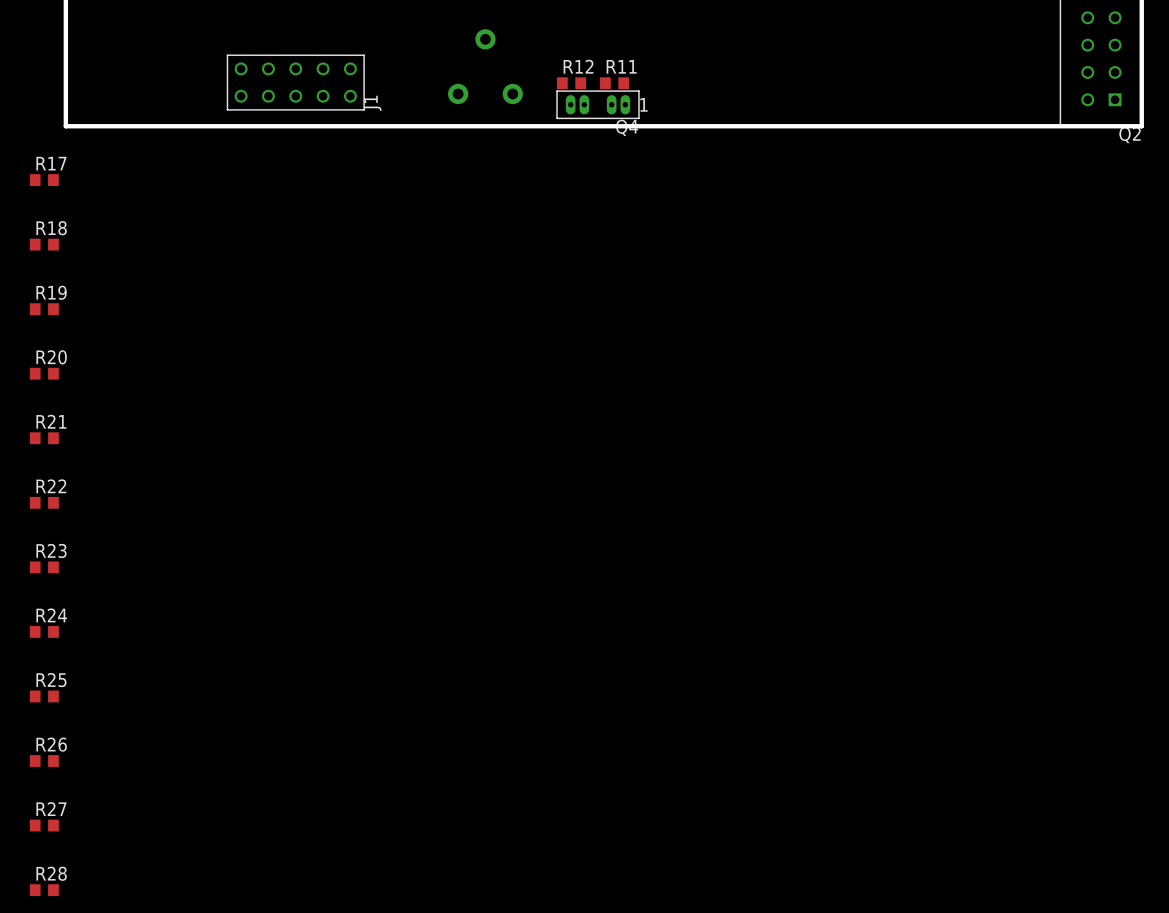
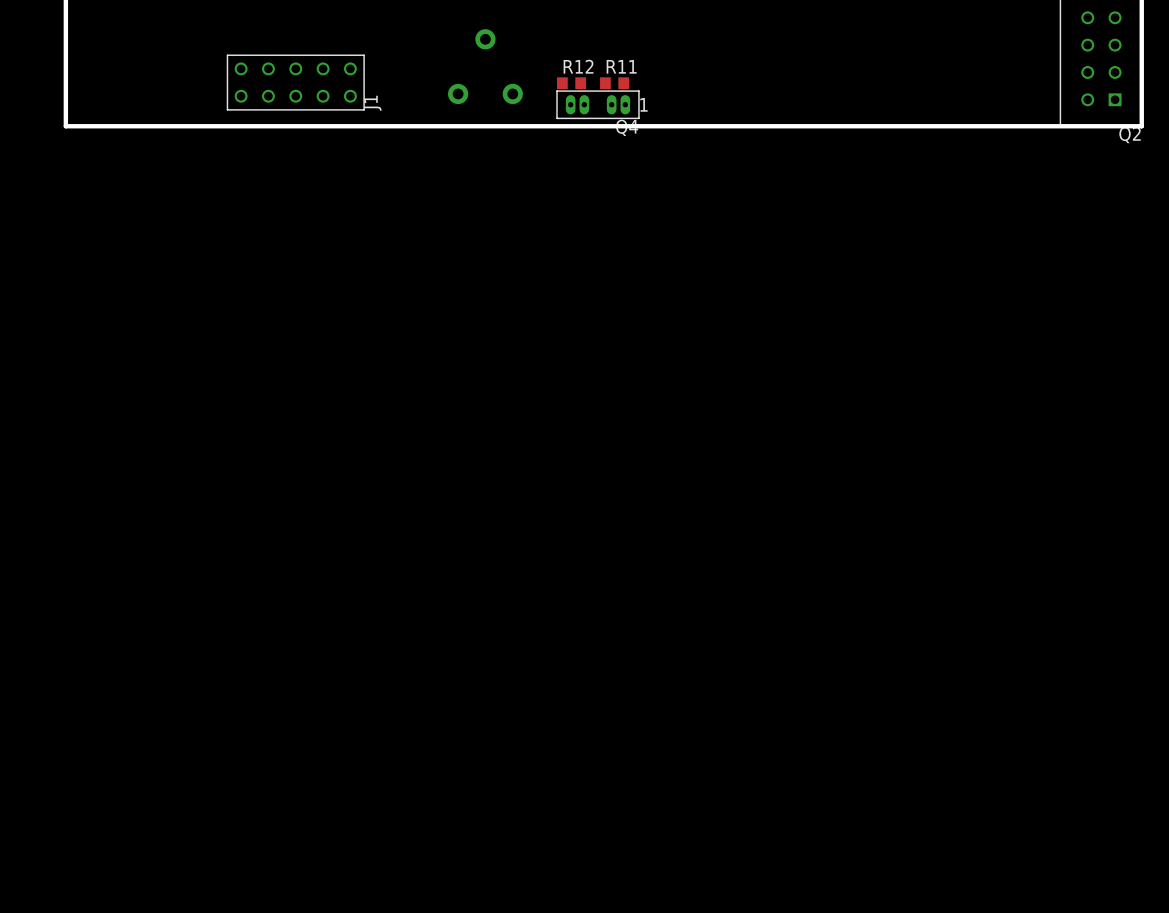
R17: (44, 180) -> none
R18: (44, 244) -> none
R19: (44, 309) -> none
R20: (44, 373) -> none
R21: (44, 438) -> none
R22: (44, 502) -> none
R23: (44, 567) -> none
R24: (44, 631) -> none
R25: (44, 696) -> none
R26: (44, 761) -> none
R27: (44, 825) -> none
R28: (44, 890) -> none

